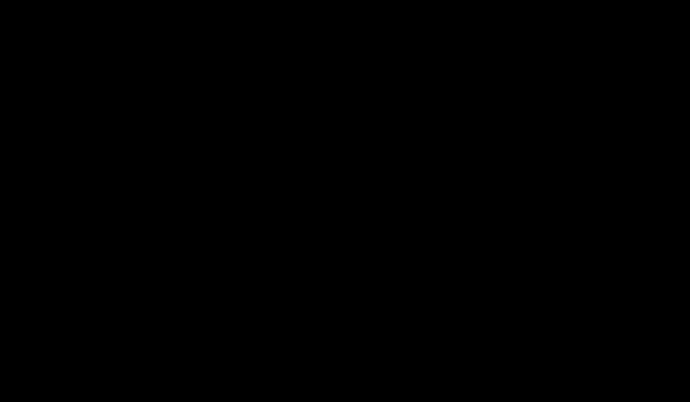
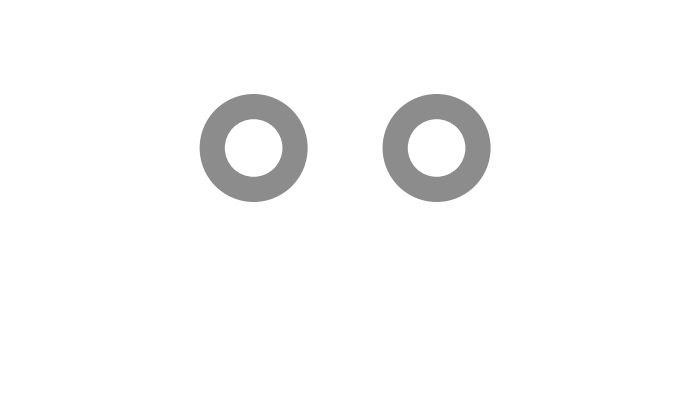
part: none -> (345, 147)

